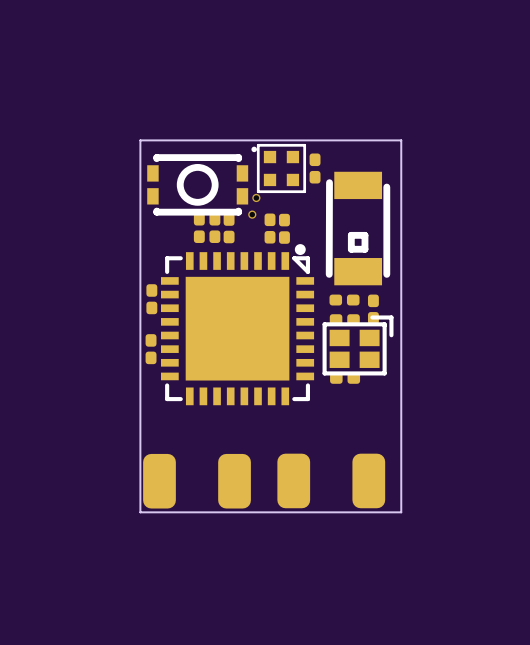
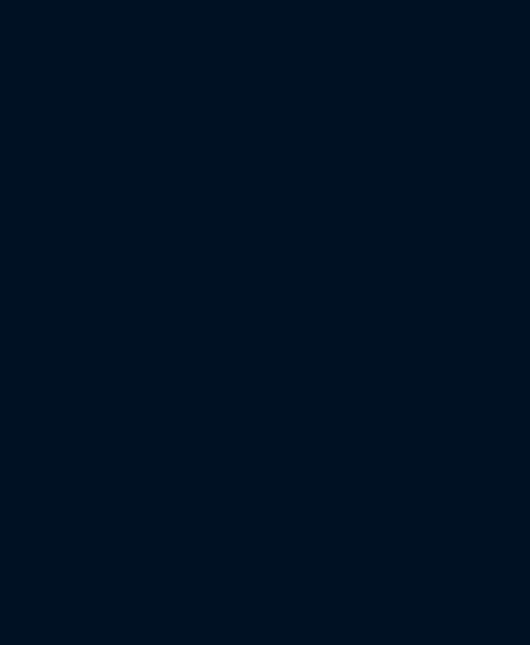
board edge: (140, 140) (401, 140) (401, 512) (140, 512) (140, 140) -> none
part: (278, 168) -> none
part: (315, 168) -> none
part: (197, 184) -> none
via: (256, 197) -> none
via: (252, 214) -> none
part: (199, 227) -> none
part: (214, 227) -> none
part: (229, 228) -> none
part: (270, 228) -> none
part: (284, 228) -> none
part: (358, 228) -> none
part: (151, 299) -> none
part: (344, 300) -> none
part: (373, 309) -> none
part: (344, 319) -> none
part: (237, 324) -> none
part: (358, 345) -> none
part: (151, 349) -> none
part: (345, 378) -> none
part: (293, 480) -> none
part: (368, 480) -> none
part: (159, 481) -> none
part: (234, 481) -> none

